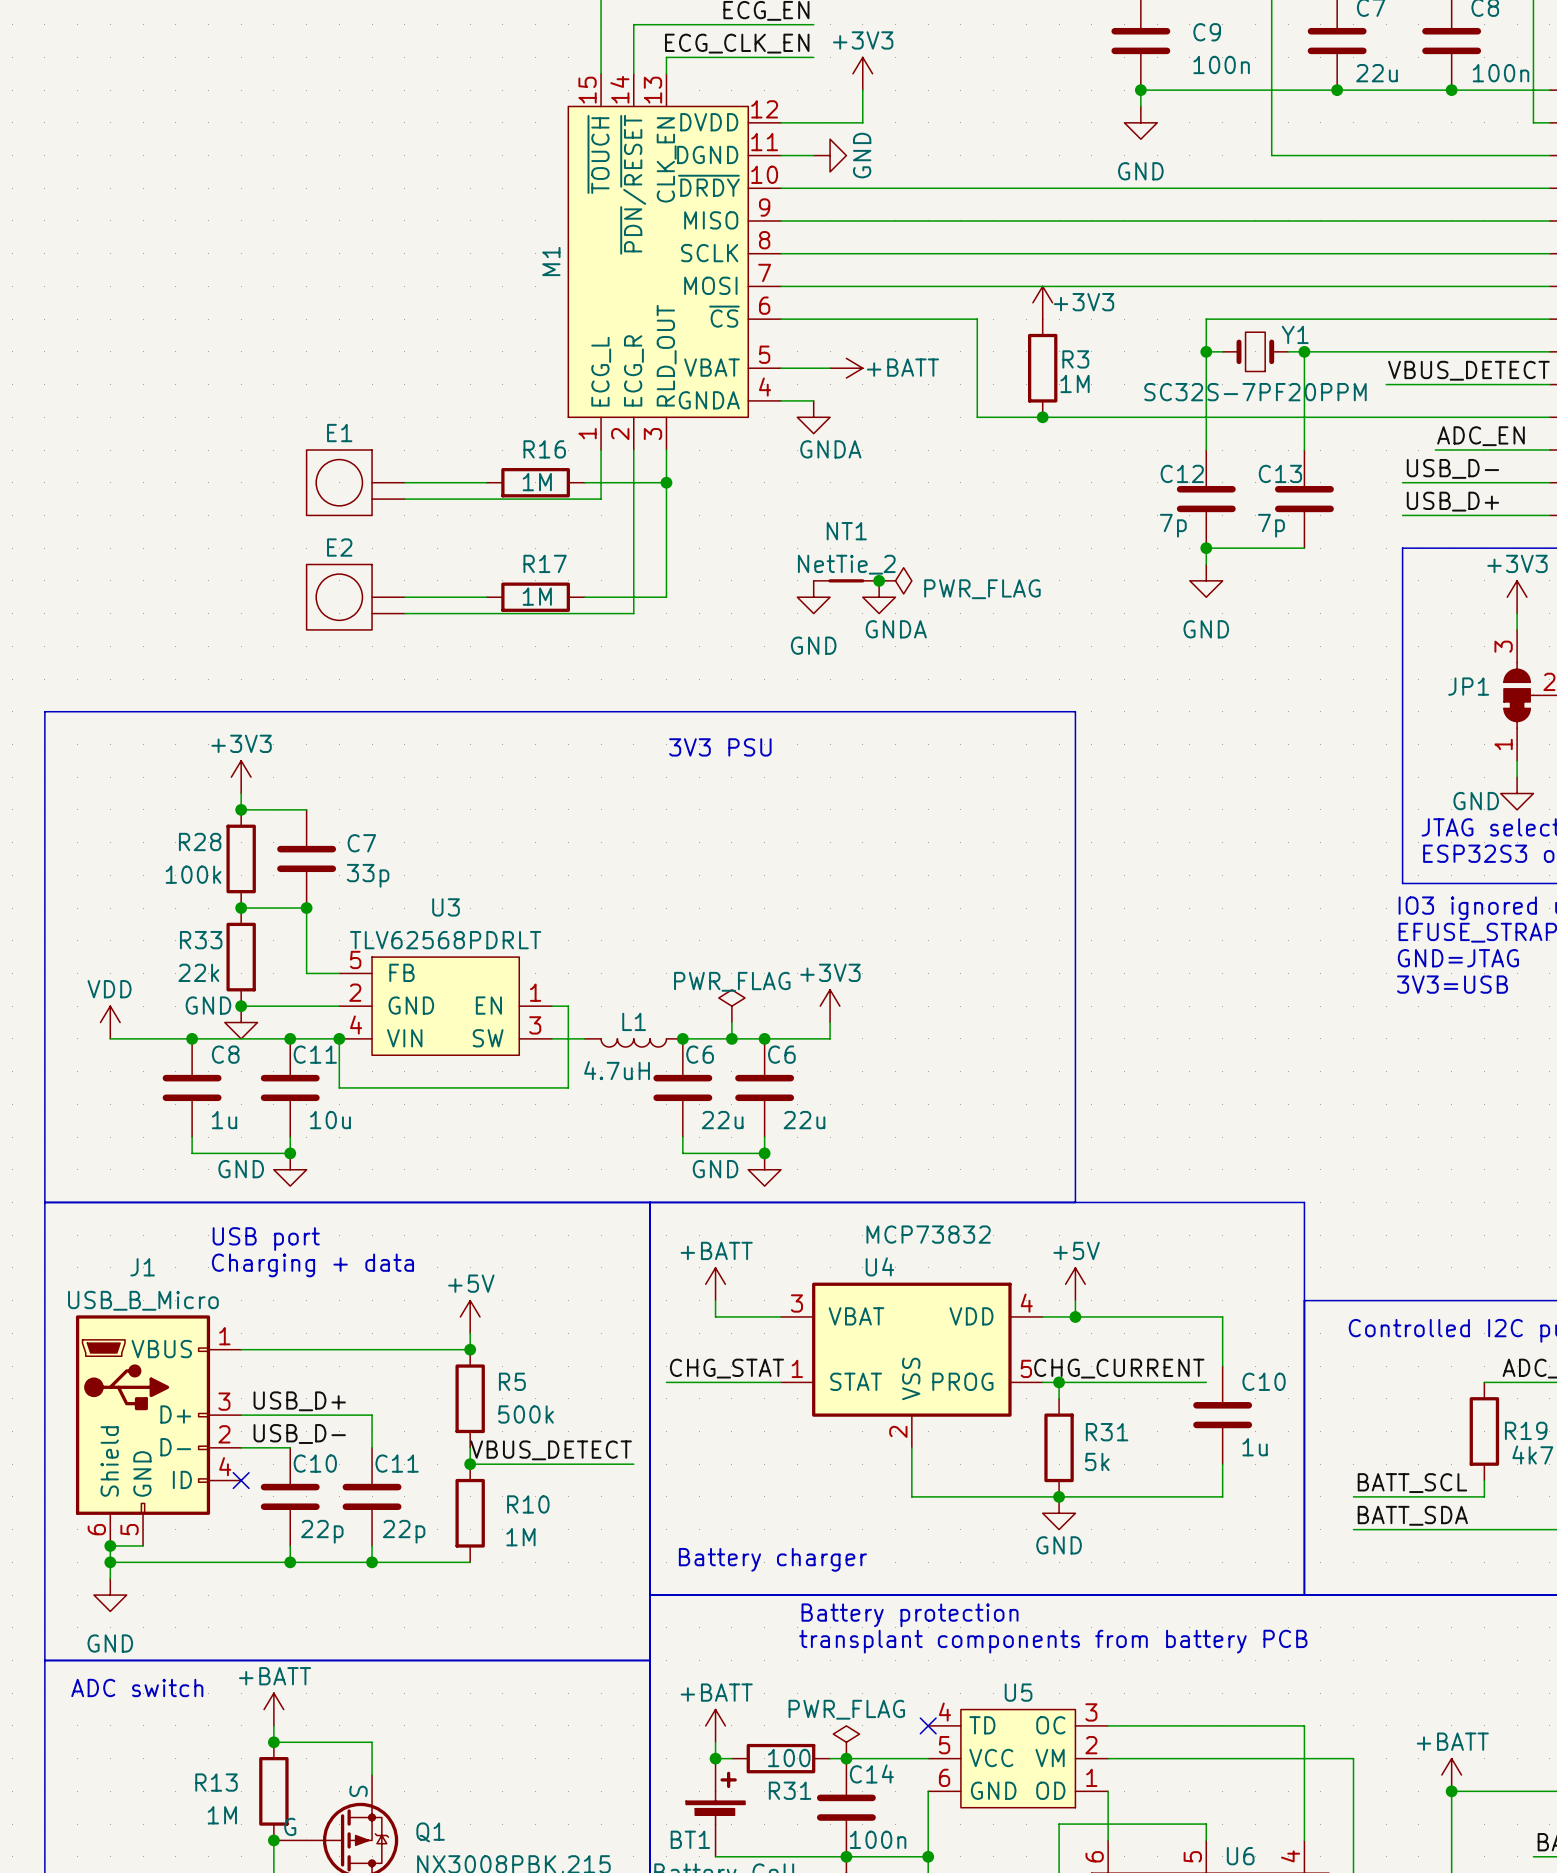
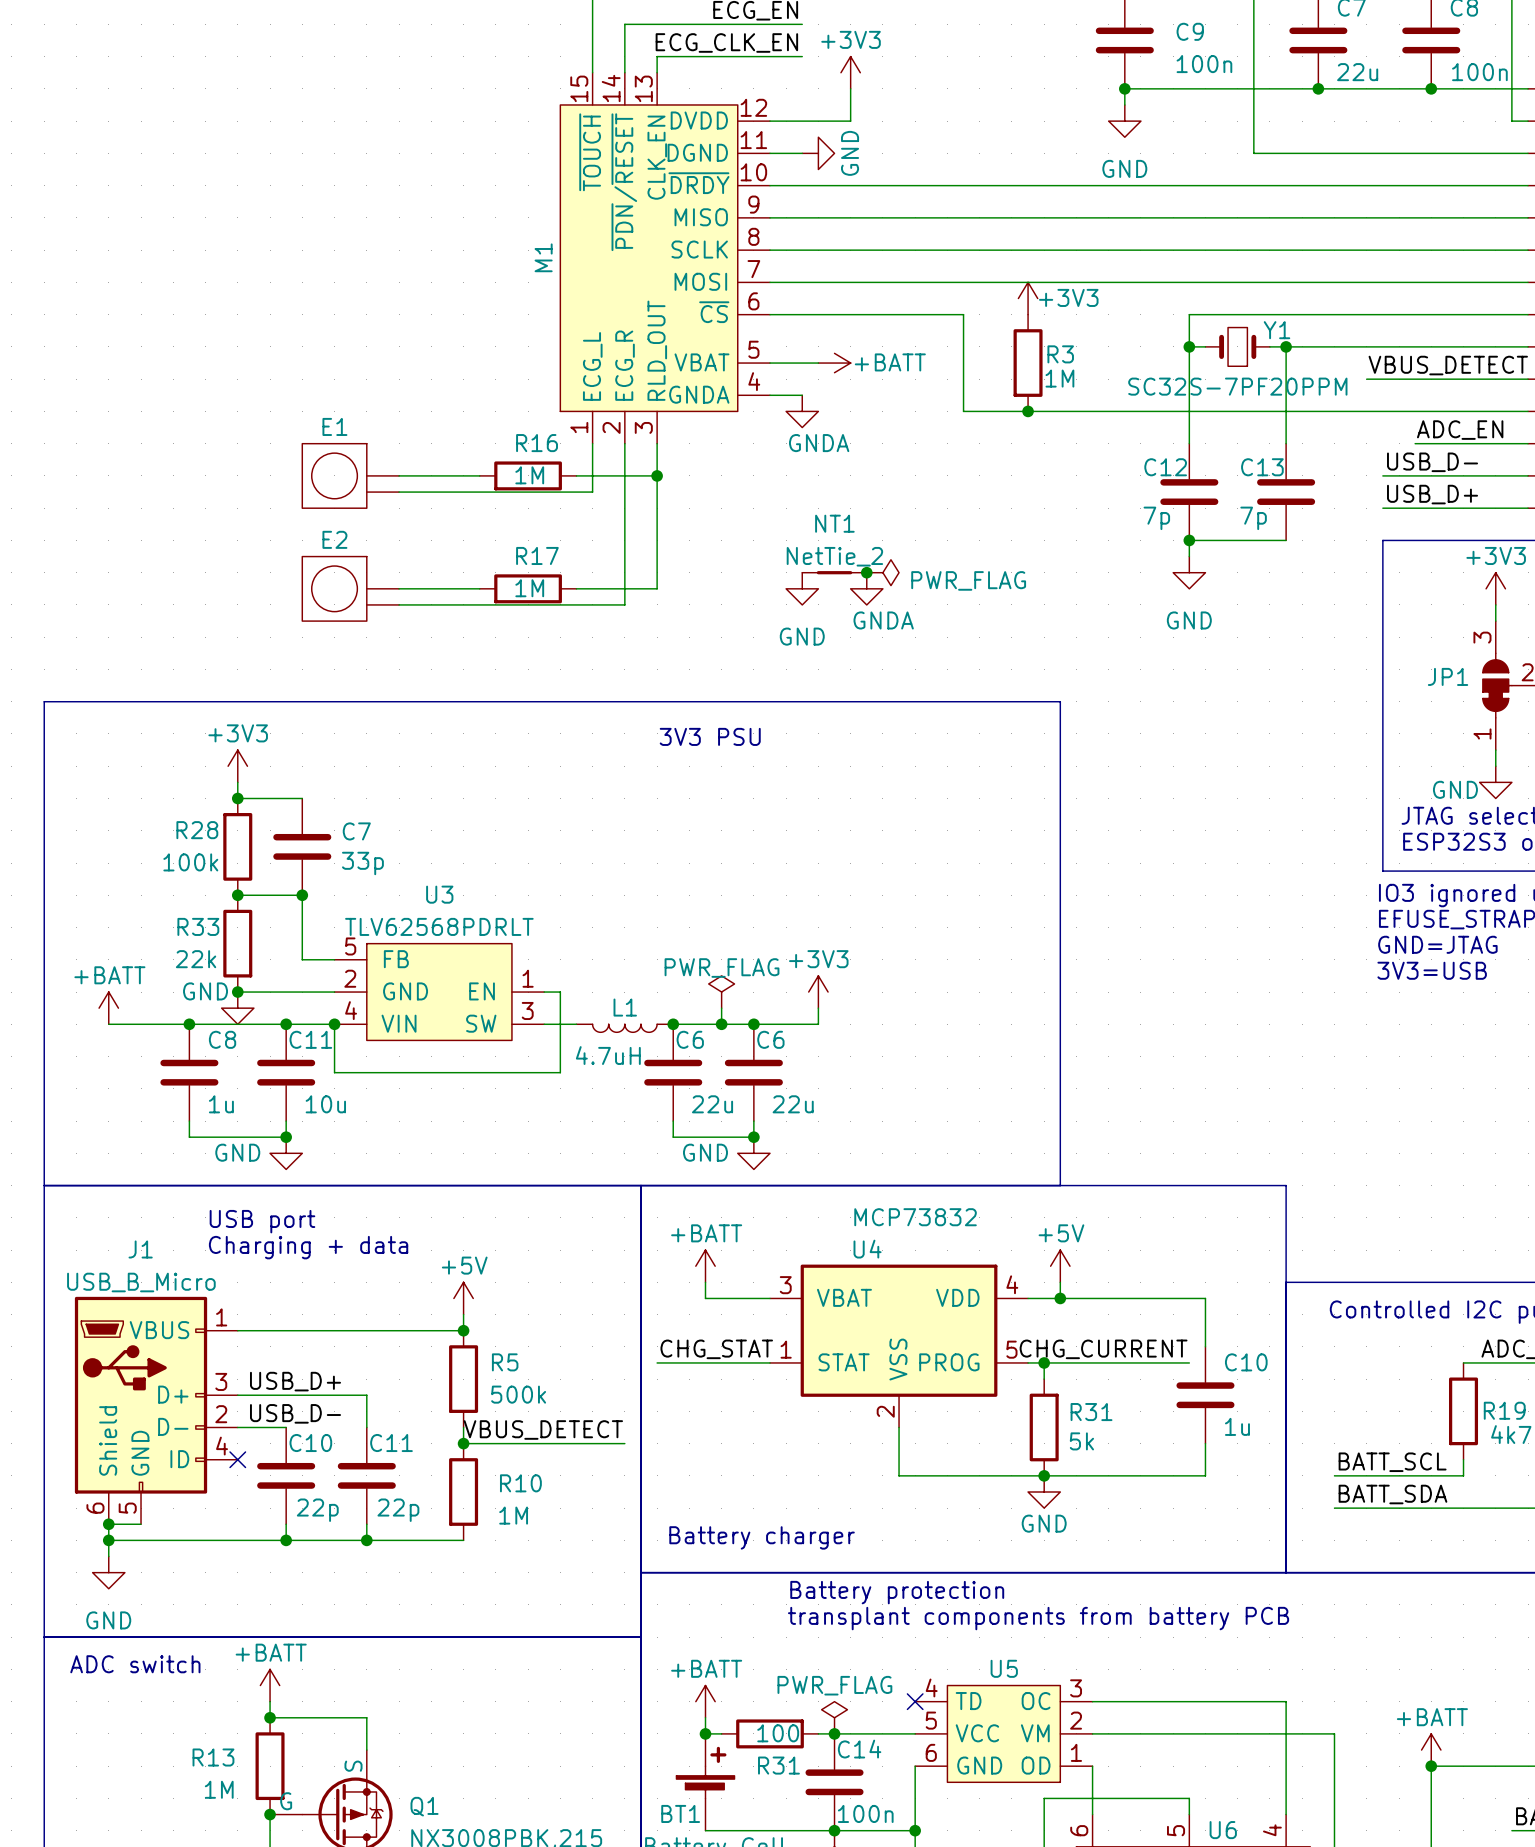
power symbol: VDD (110, 1022) -> +BATT (108, 1008)

